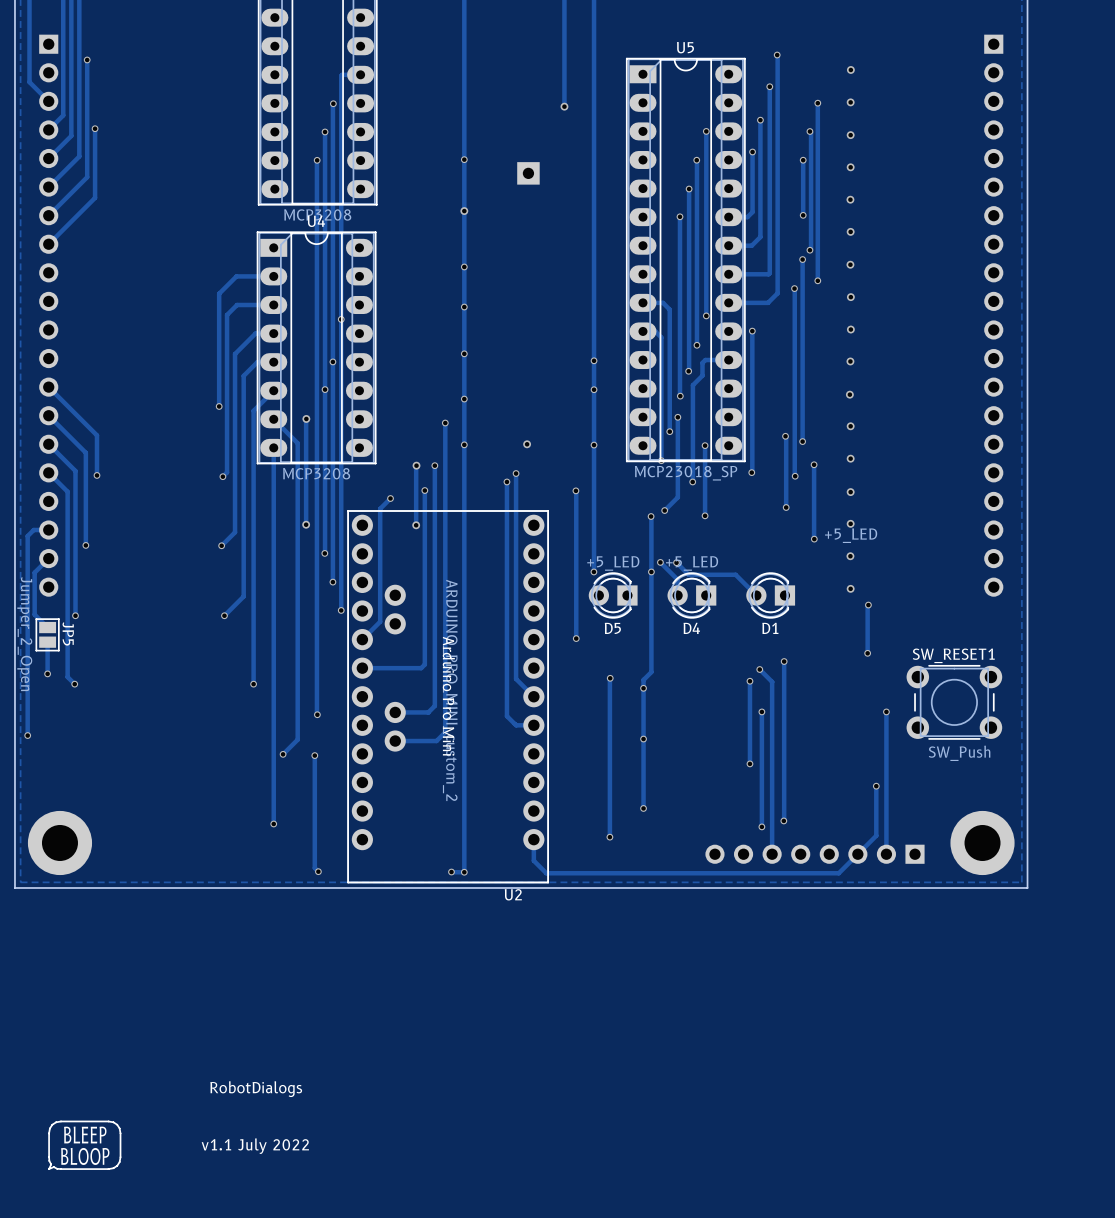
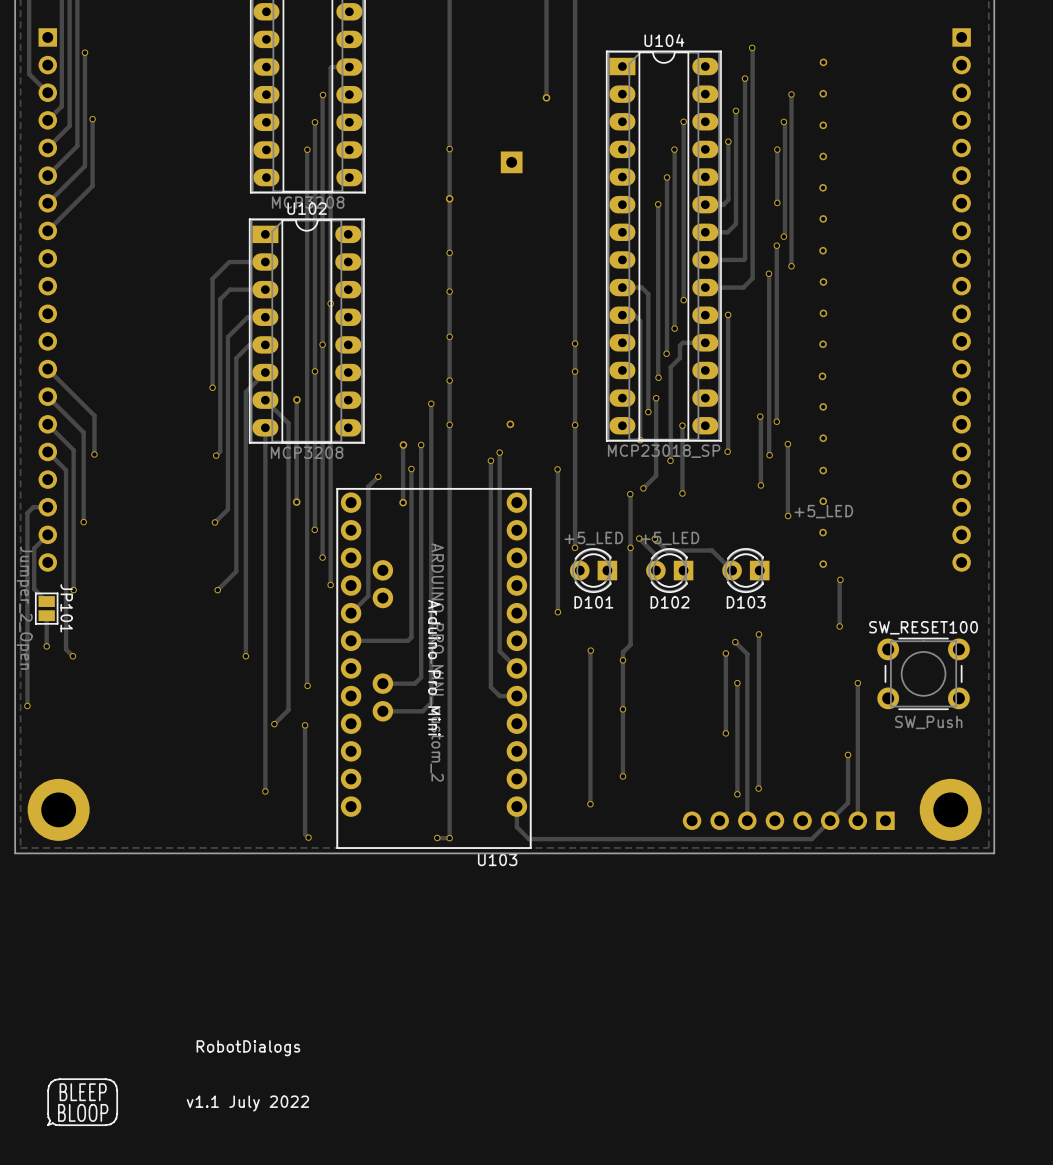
U5 name: U5 (685, 47) -> U104 (664, 40)
U4 name: U4 (316, 221) -> U102 (307, 208)
D5 name: D5 (612, 628) -> D101 (593, 602)
D4 name: D4 (691, 628) -> D102 (670, 602)
D1 name: D1 (770, 628) -> D103 (746, 602)
JP5 name: JP5 (68, 633) -> JP101 (66, 608)
SW_RESET1 name: SW_RESET1 (953, 655) -> SW_RESET100 (923, 627)
U2 name: U2 (513, 894) -> U103 (497, 859)

